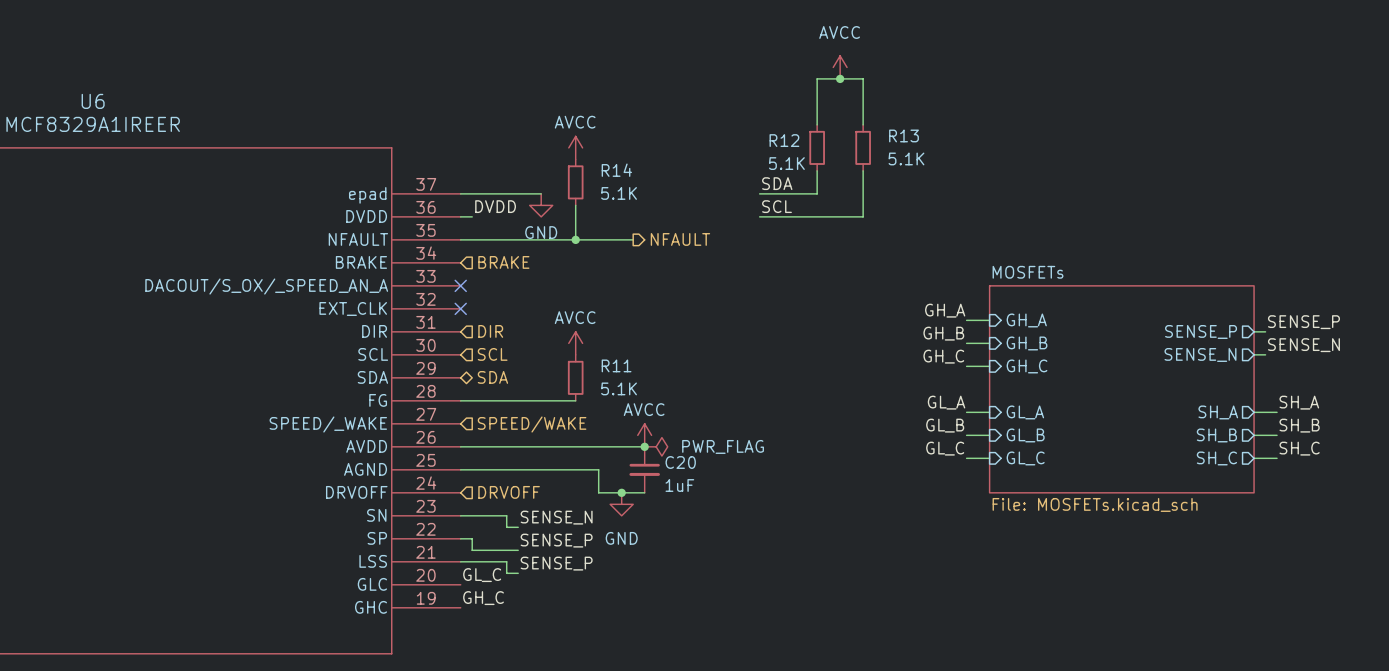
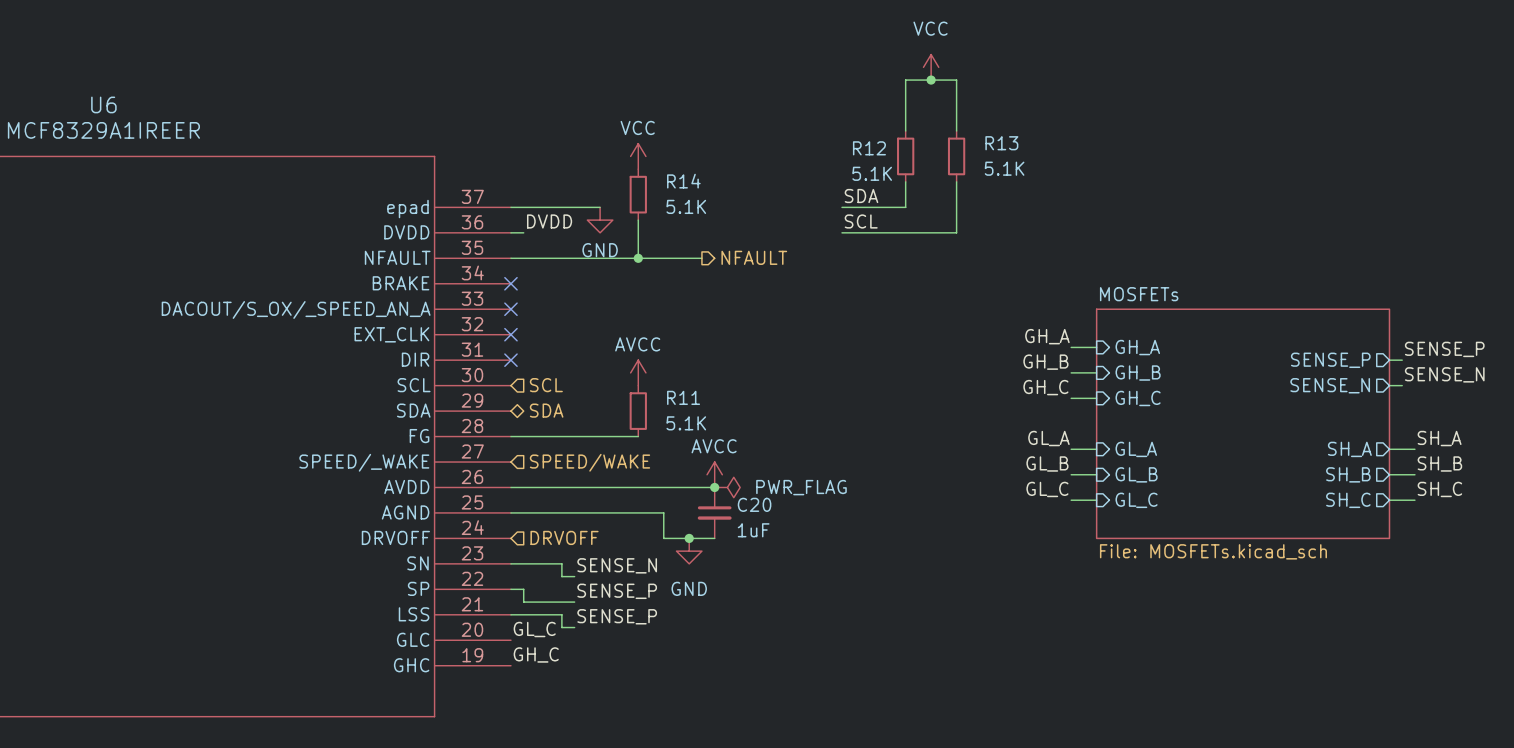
power symbol: AVCC (840, 67) -> VCC (931, 67)
power symbol: AVCC (575, 147) -> VCC (638, 156)
no-connect mark: none -> (510, 283)
hierarchical label: BRAKE (503, 262) -> none
no-connect mark: none -> (510, 360)
hierarchical label: DIR (490, 331) -> none

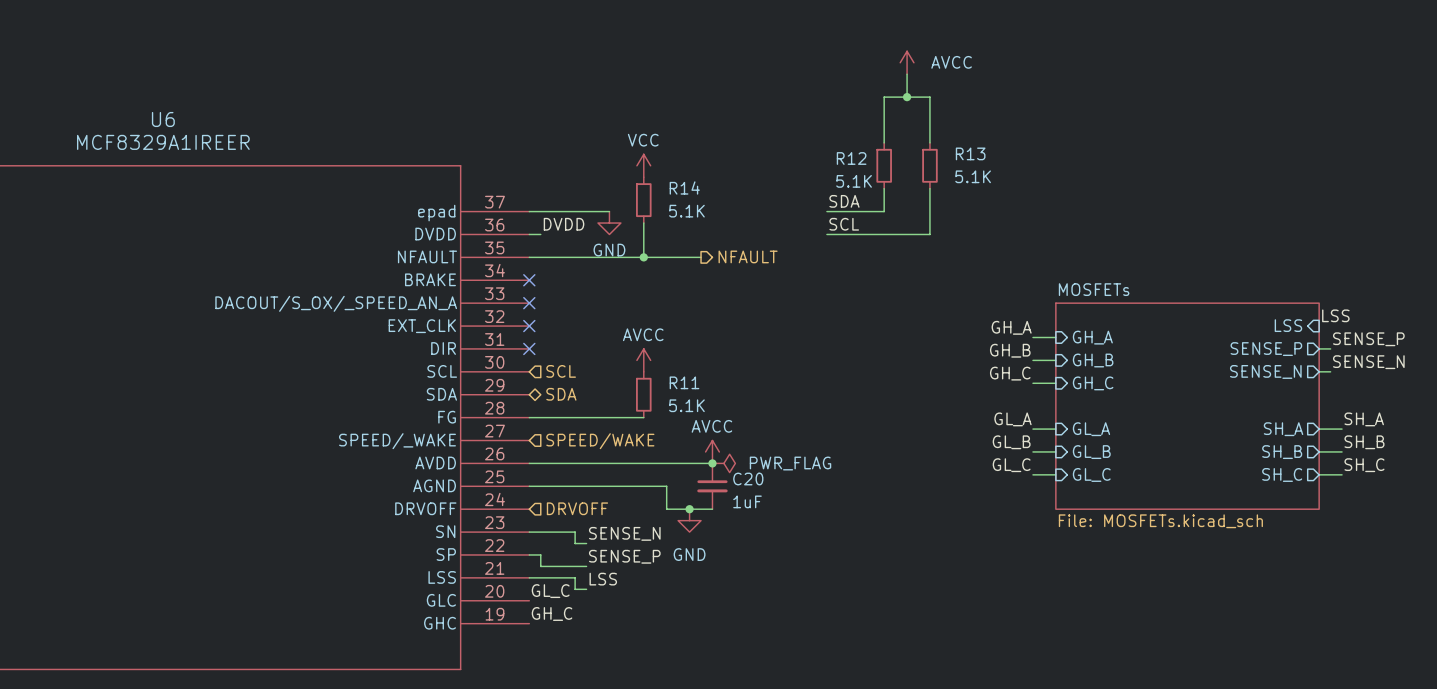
power symbol: none -> AVCC (907, 62)
power symbol: VCC (931, 67) -> none
label: none -> LSS (1335, 315)
sheet pin: none -> LSS (1288, 325)
label: SENSE_P (617, 616) -> LSS (603, 579)

